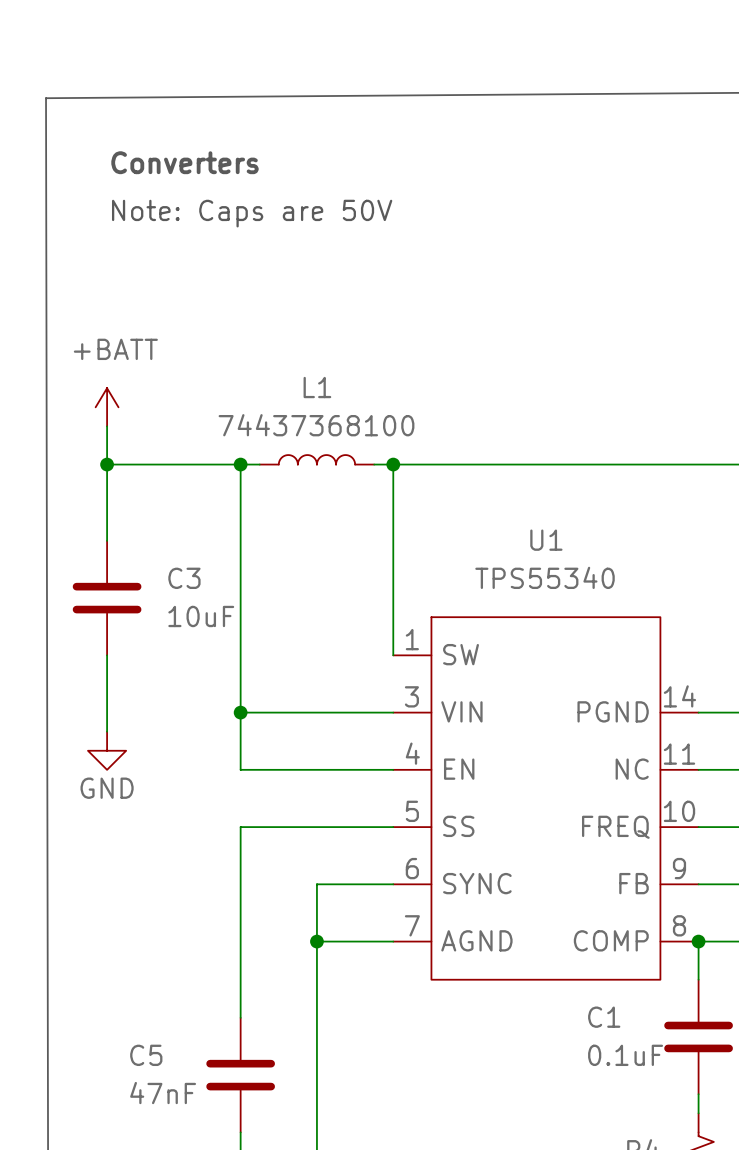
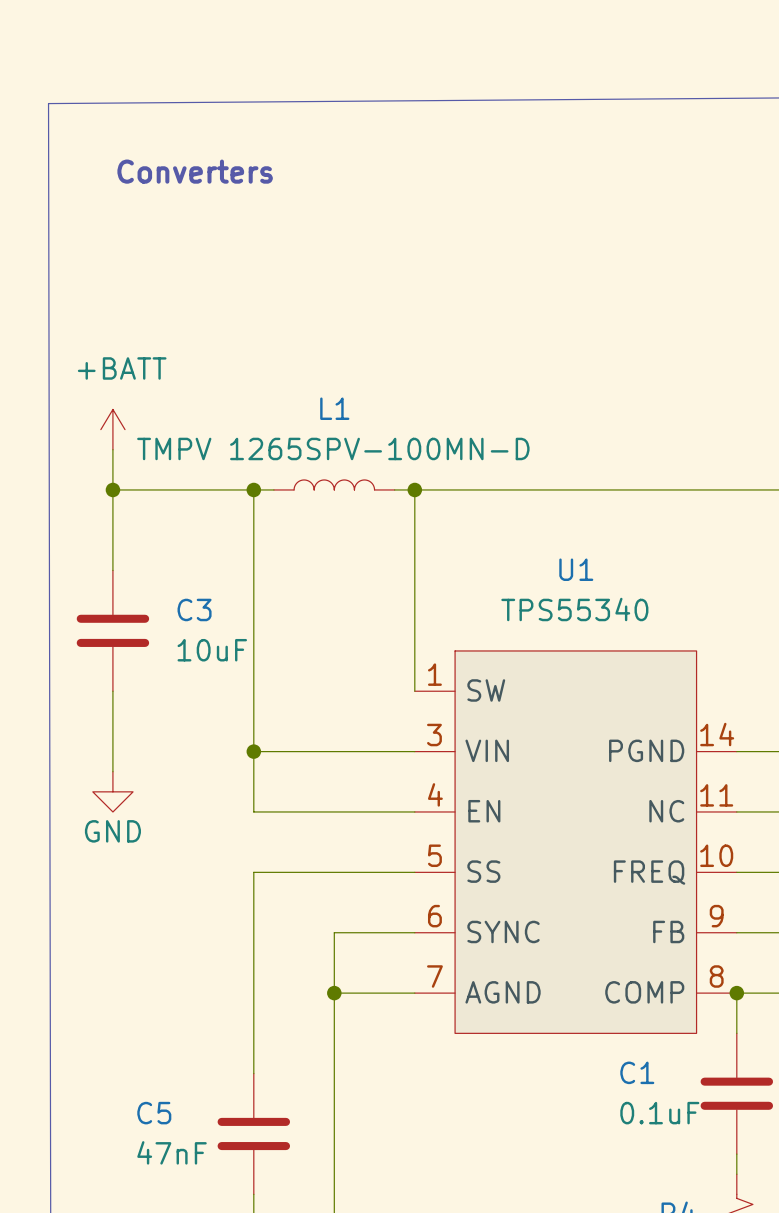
text: Note: Caps are 50V (252, 213) -> none
L1 value: 74437368100 (316, 425) -> TMPV 1265SPV-100MN-D (333, 448)

